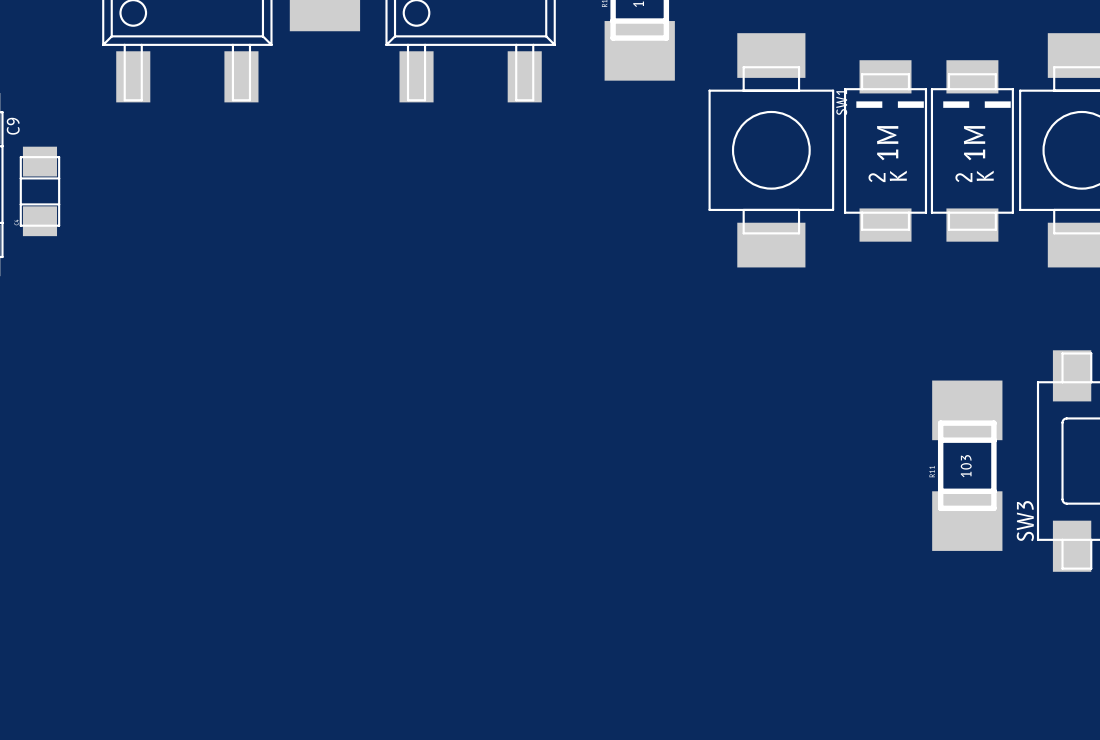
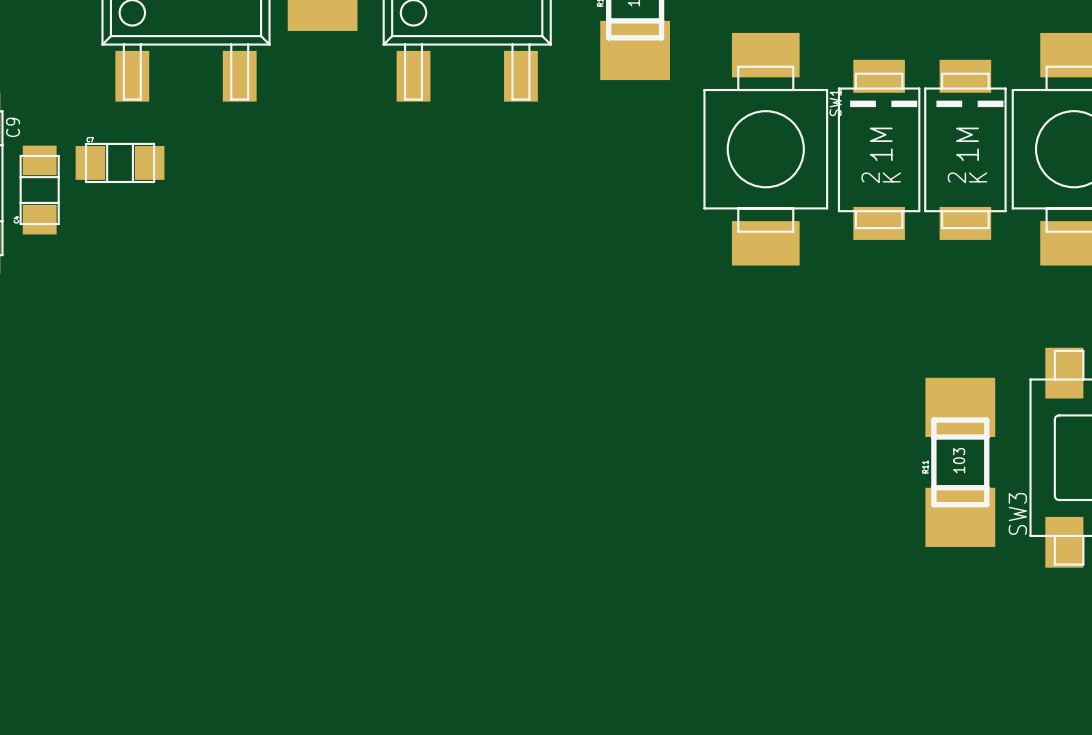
part: none -> (120, 162)

